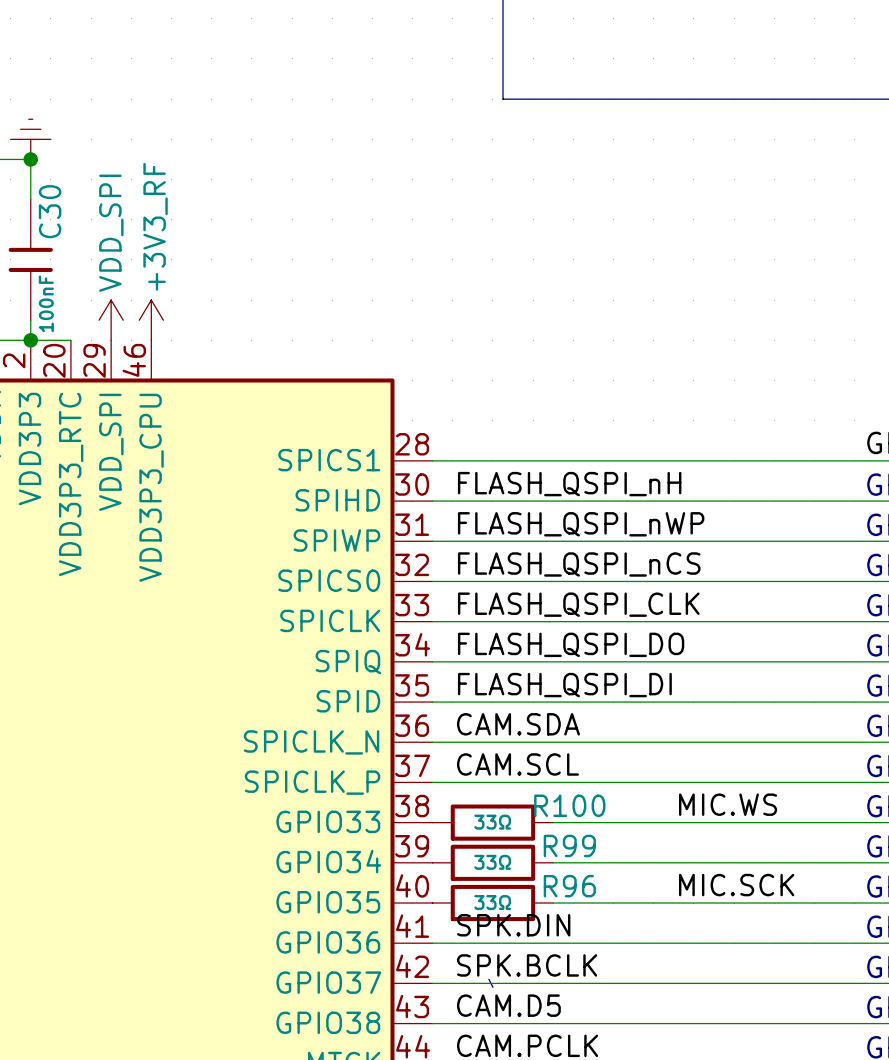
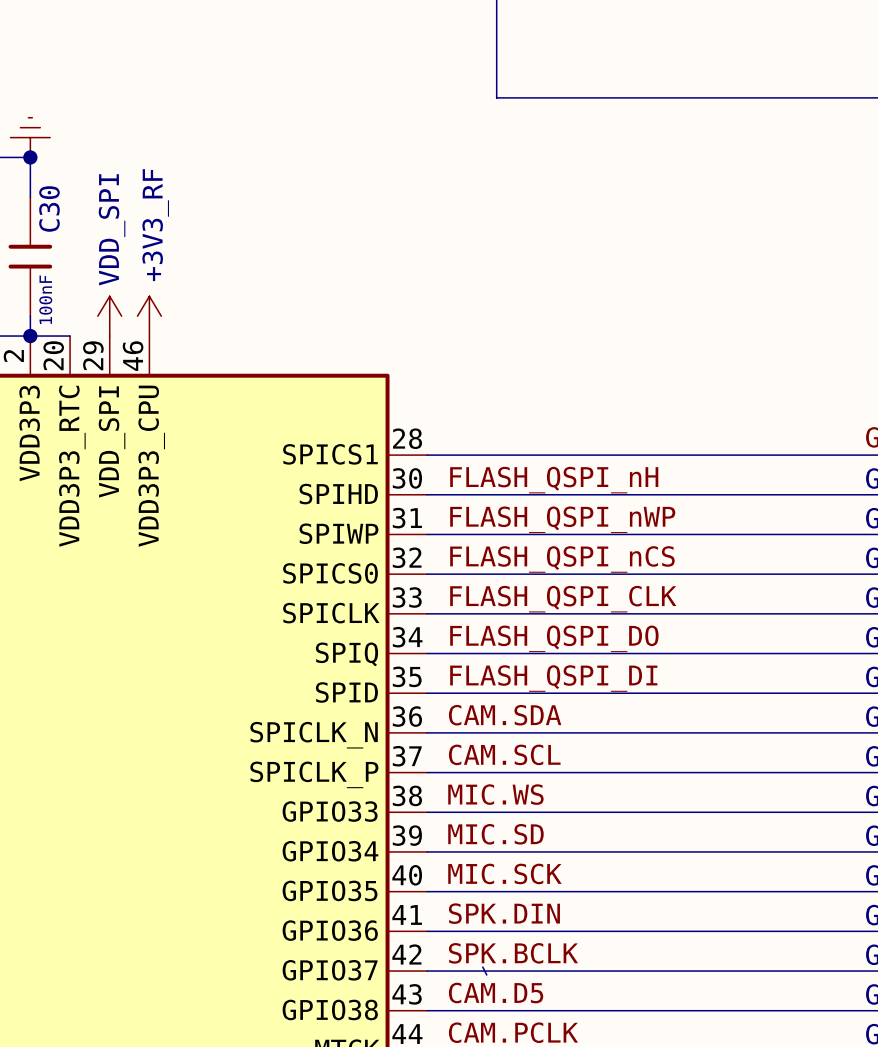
label position: MIC.WS (728, 804) -> MIC.WS (495, 794)
wire: none -> (427, 812) (546, 812)
R100: 33Ω (492, 822) -> none
label: none -> MIC.SD (495, 834)
wire: none -> (427, 851) (546, 851)
R99: 33Ω (492, 862) -> none
label position: MIC.SCK (736, 885) -> MIC.SCK (504, 873)
wire: none -> (427, 891) (546, 891)
R96: 33Ω (492, 903) -> none

